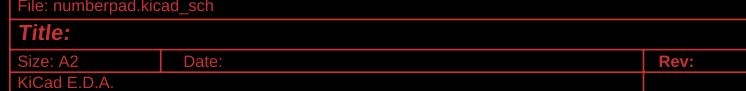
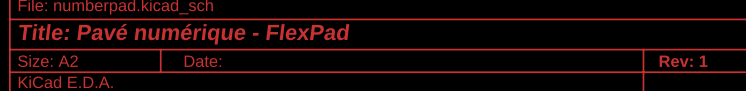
title block: Title: (44, 32) -> Title: Pavé numérique - FlexPad (184, 34)
title block: Rev: (676, 61) -> Rev: 1 (683, 61)

